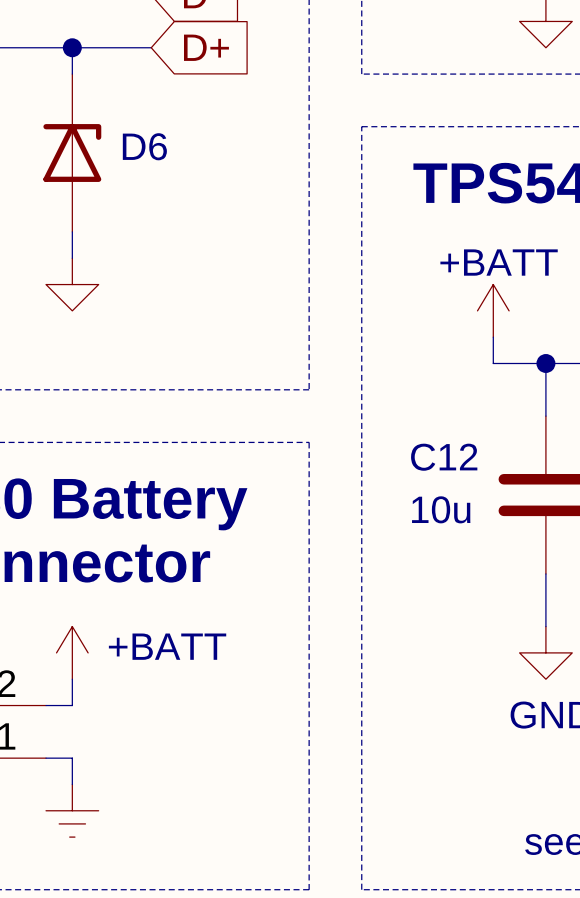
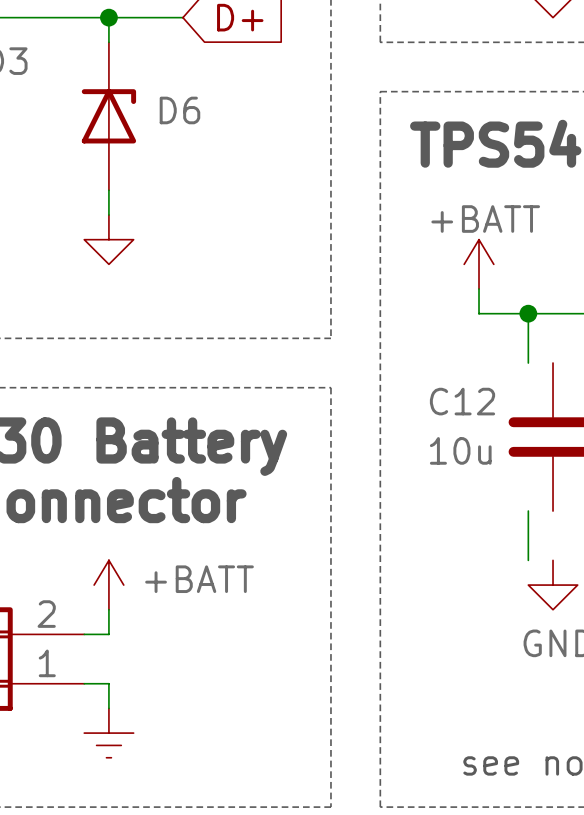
power symbol position: +BATT (493, 310) -> +BATT (479, 264)
wire: (493, 337) (493, 363) -> (479, 289) (479, 313) (503, 313)
junction: none -> (528, 313)
wire: (545, 363) (545, 416) -> (528, 313) (528, 363)
junction: (545, 363) -> none
wire: (545, 573) (545, 626) -> (528, 511) (528, 560)

